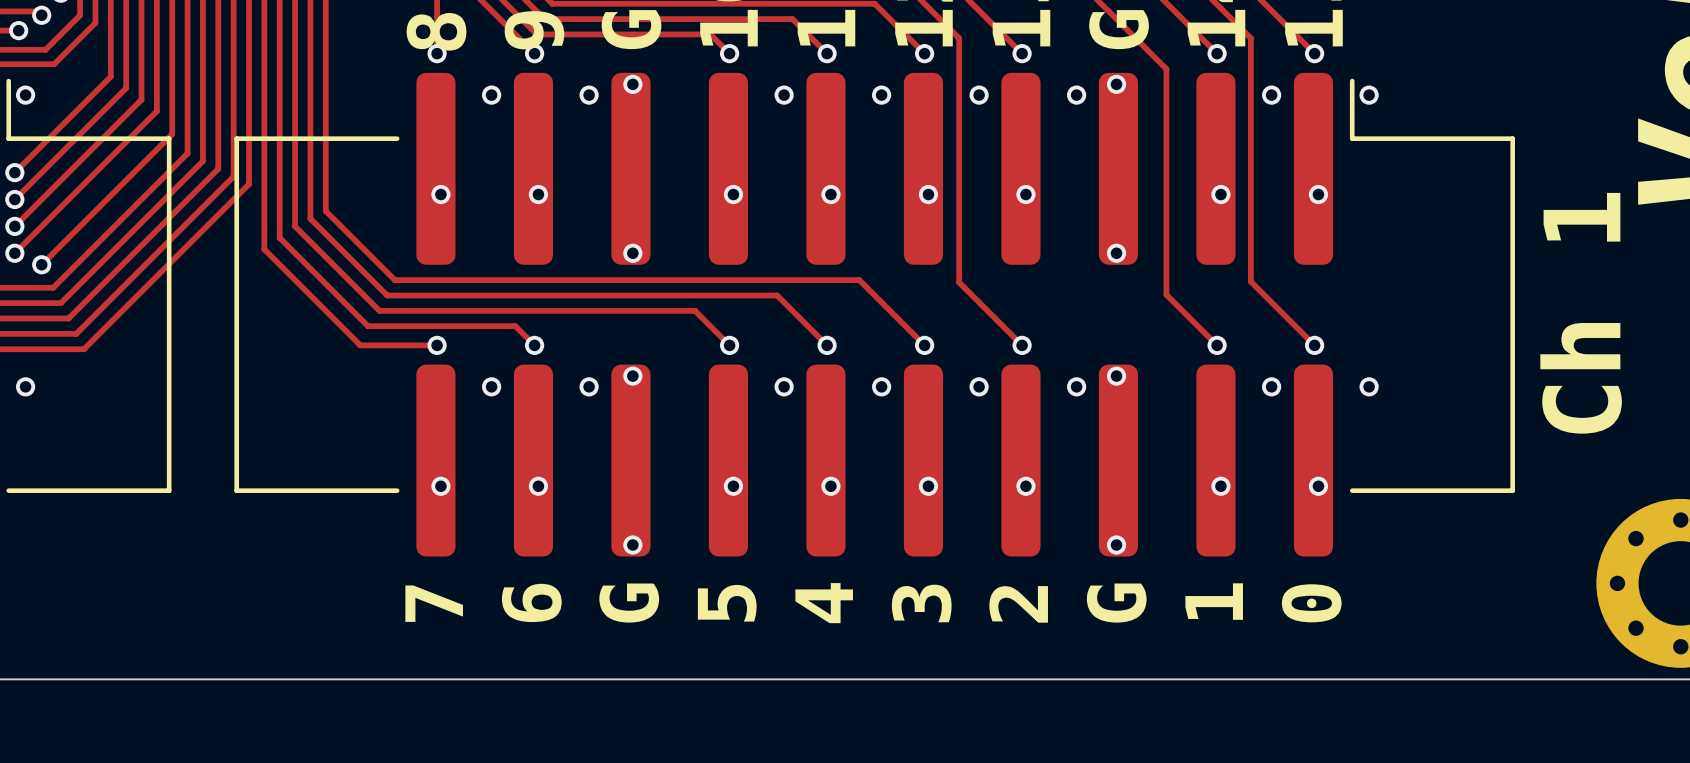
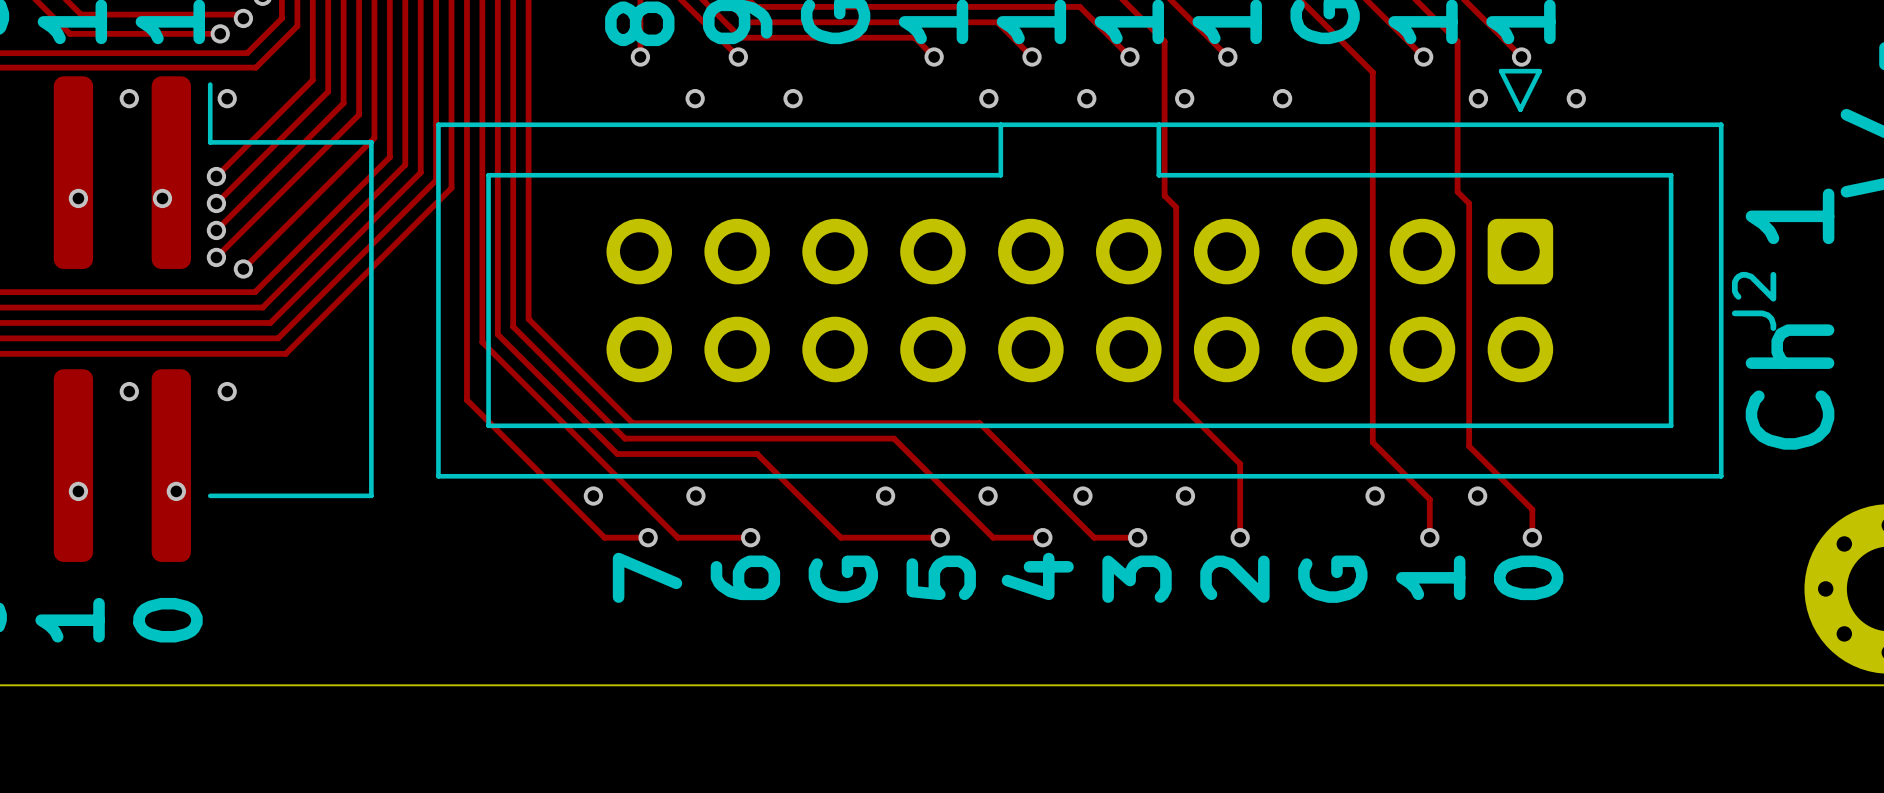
via: (632, 84) -> none
via: (1116, 84) -> none
track: (1250, 188) (1250, 281) (1314, 345) -> (1457, 191) (1469, 203) (1469, 446) (1532, 509) (1532, 537)
track: (959, 191) (959, 282) (1022, 345) -> (1164, 195) (1176, 207) (1176, 400) (1240, 464) (1240, 537)
via: (440, 194) -> none
via: (538, 194) -> none
via: (733, 194) -> none
via: (830, 194) -> none
via: (928, 194) -> none
via: (1025, 194) -> none
via: (1220, 194) -> none
via: (1318, 194) -> none
track: (325, 211) (394, 280) (859, 280) (924, 345) -> (528, 215) (528, 319) (632, 423) (979, 423) (1094, 537) (1137, 537)
track: (310, 218) (387, 295) (777, 295) (827, 345) -> (513, 222) (513, 326) (625, 438) (894, 438) (993, 537) (1042, 537)
track: (295, 226) (379, 310) (695, 310) (729, 345) -> (497, 230) (497, 334) (617, 454) (757, 454) (840, 537) (940, 537)
track: (279, 237) (368, 326) (515, 326) (534, 345) -> (482, 242) (482, 342) (677, 537) (750, 537)
track: (264, 249) (360, 345) (437, 345) -> (466, 253) (466, 400) (604, 537) (648, 537)
via: (632, 253) -> none
via: (1116, 253) -> none
J2: none -> (1079, 273)
track: (1166, 294) (1217, 345) -> (1372, 299) (1372, 442) (1429, 499) (1429, 537)
part: (874, 314) -> none
via: (437, 345) -> none
via: (534, 345) -> none
via: (729, 345) -> none
via: (827, 345) -> none
via: (924, 345) -> none
via: (1022, 345) -> none
via: (1217, 345) -> none
via: (1314, 345) -> none
via: (632, 376) -> none
via: (1116, 376) -> none
via: (491, 386) -> none
via: (589, 386) -> none
via: (784, 386) -> none
via: (881, 386) -> none
via: (979, 386) -> none
via: (1076, 386) -> none
via: (1271, 386) -> none
via: (1369, 386) -> none
via: (440, 486) -> none
via: (538, 486) -> none
via: (733, 486) -> none
via: (830, 486) -> none
via: (928, 486) -> none
via: (1025, 486) -> none
via: (1220, 486) -> none
via: (1318, 486) -> none
via: none -> (593, 496)
via: none -> (695, 496)
via: none -> (885, 496)
via: none -> (988, 496)
via: none -> (1082, 496)
via: none -> (1185, 496)
via: none -> (1375, 496)
via: none -> (1477, 496)
via: none -> (648, 537)
via: none -> (750, 537)
via: none -> (940, 537)
via: none -> (1042, 537)
via: none -> (1137, 537)
via: none -> (1240, 537)
via: none -> (1429, 537)
via: none -> (1532, 537)
via: (632, 544) -> none
via: (1116, 544) -> none
text position: 1 (1214, 601) -> 1 (1430, 577)
text position: 6 (531, 602) -> 6 (745, 577)
text position: 7 (434, 603) -> 7 (647, 577)
text position: G (629, 603) -> G (843, 579)
text position: 5 (727, 603) -> 5 (941, 577)
text position: 4 (824, 603) -> 4 (1037, 576)
text position: 3 (921, 603) -> 3 (1137, 579)
text position: G (1116, 603) -> G (1332, 579)
text position: 0 (1311, 603) -> 0 (1528, 577)
text position: 2 (1018, 604) -> 2 (1234, 579)

